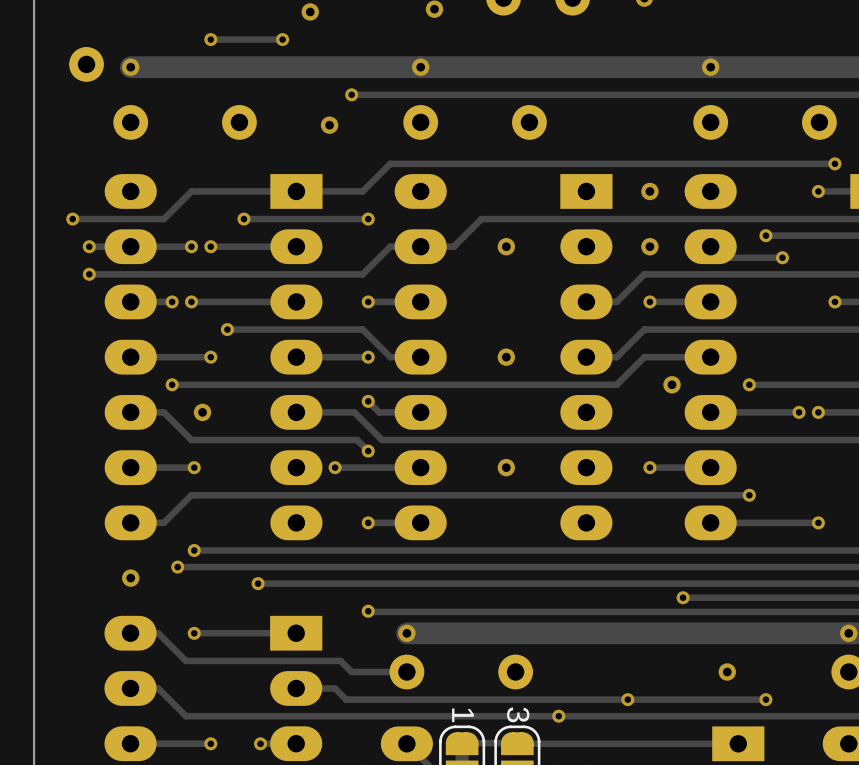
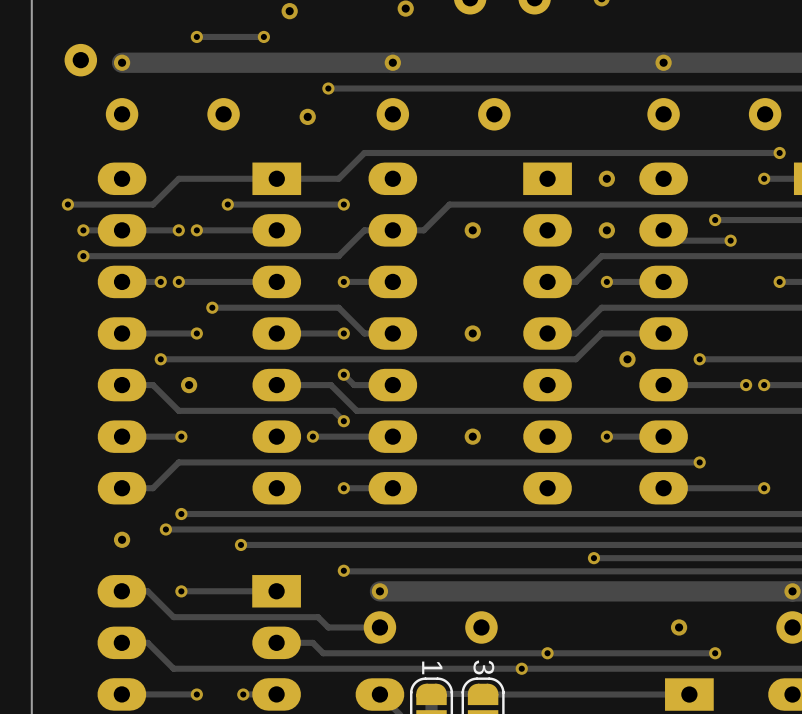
track: none -> (637, 558) (593, 558)
via position: (683, 597) -> (593, 558)
via: none -> (547, 653)
via: (627, 699) -> none

